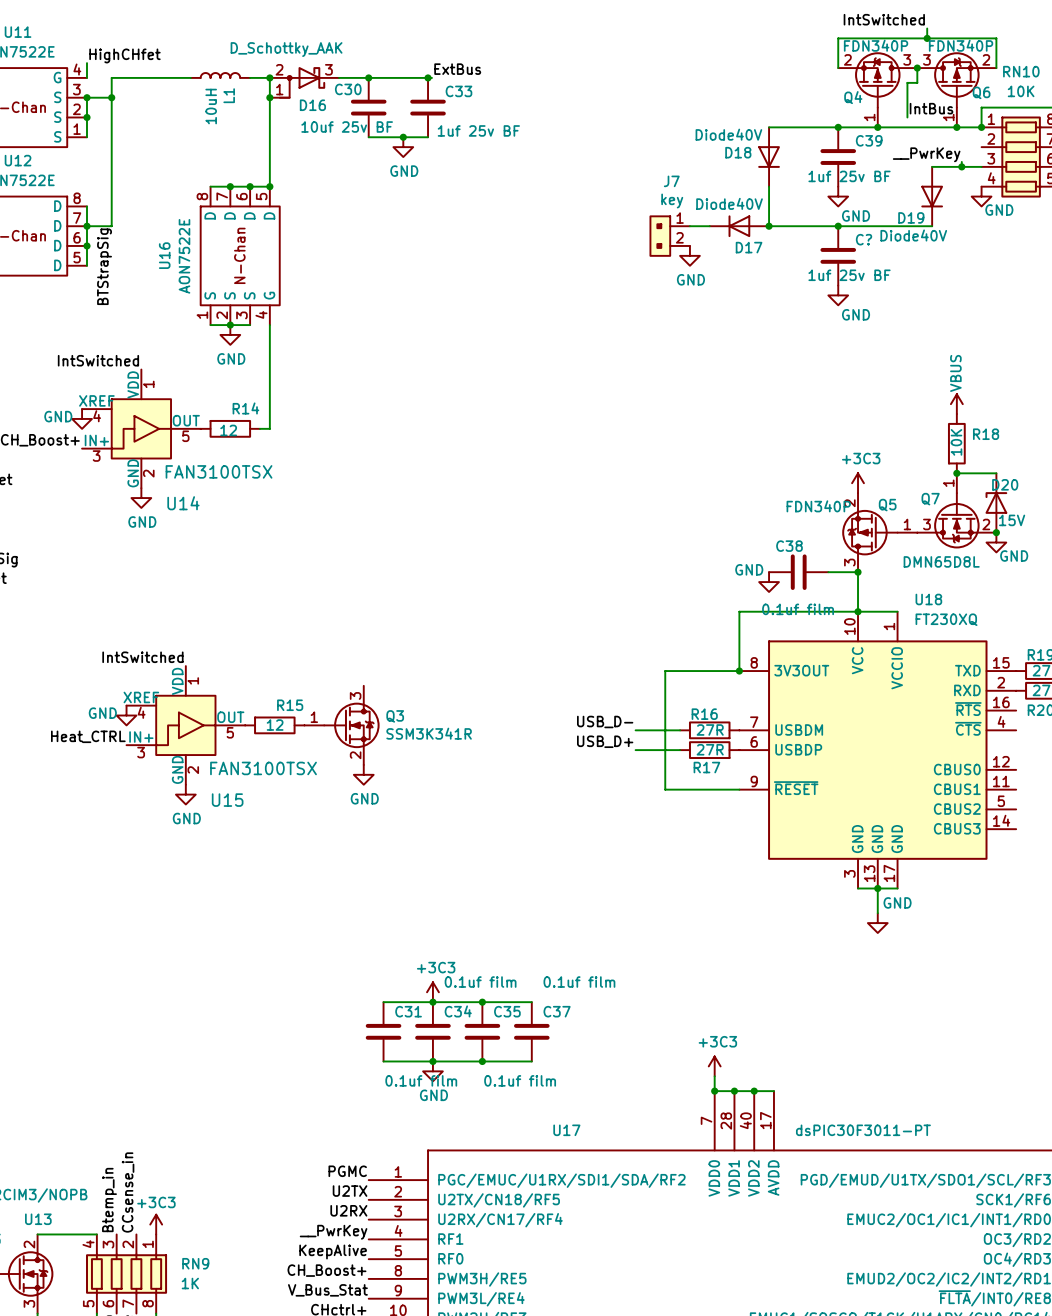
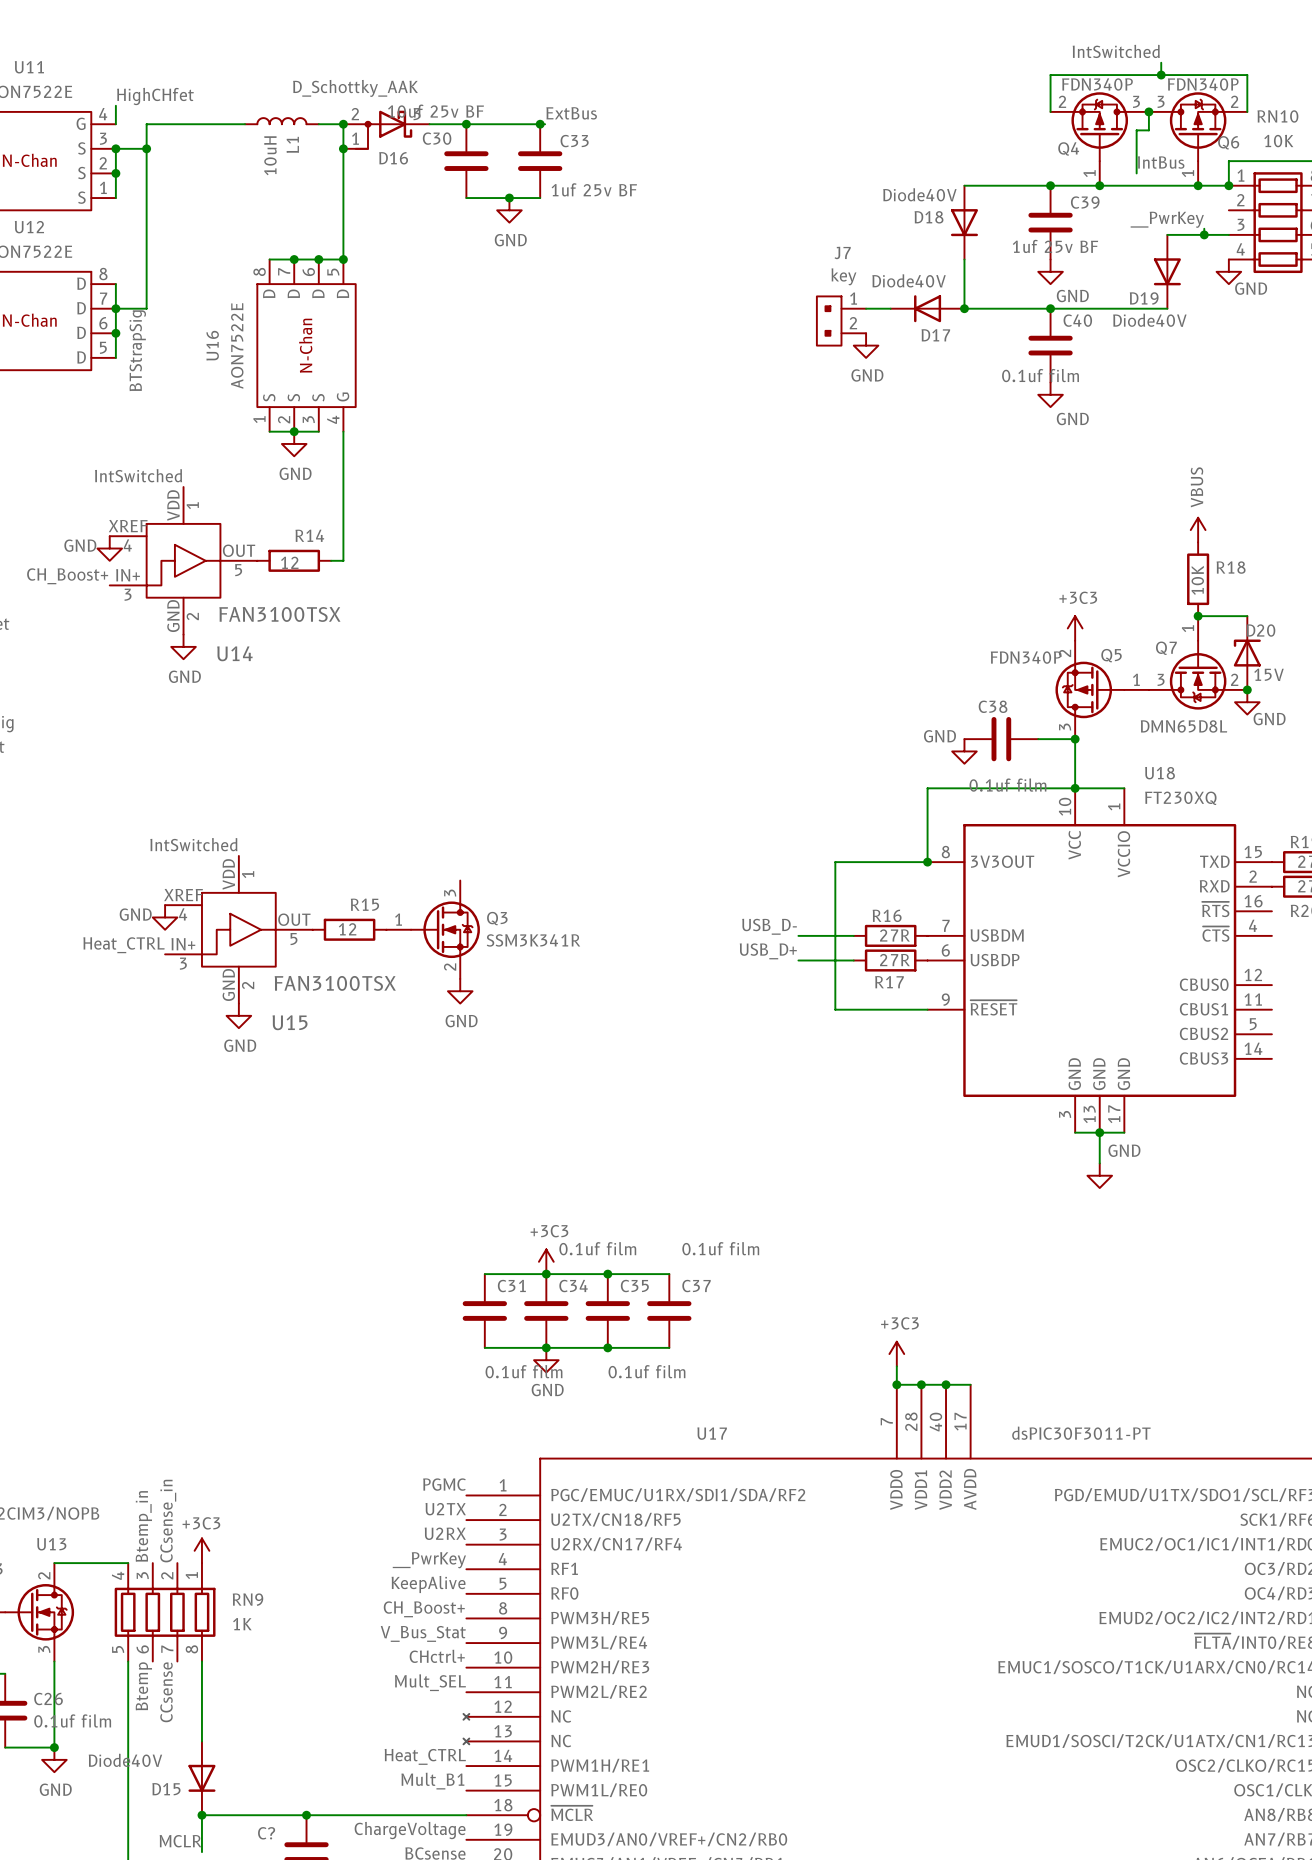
C30 value position: 10uf 25v BF (347, 127) -> 10uf 25v BF (435, 111)
C? name: C? (864, 239) -> C40 (1077, 320)
C? value: 1uf 25v BF (849, 275) -> 0.1uf film (1040, 375)

